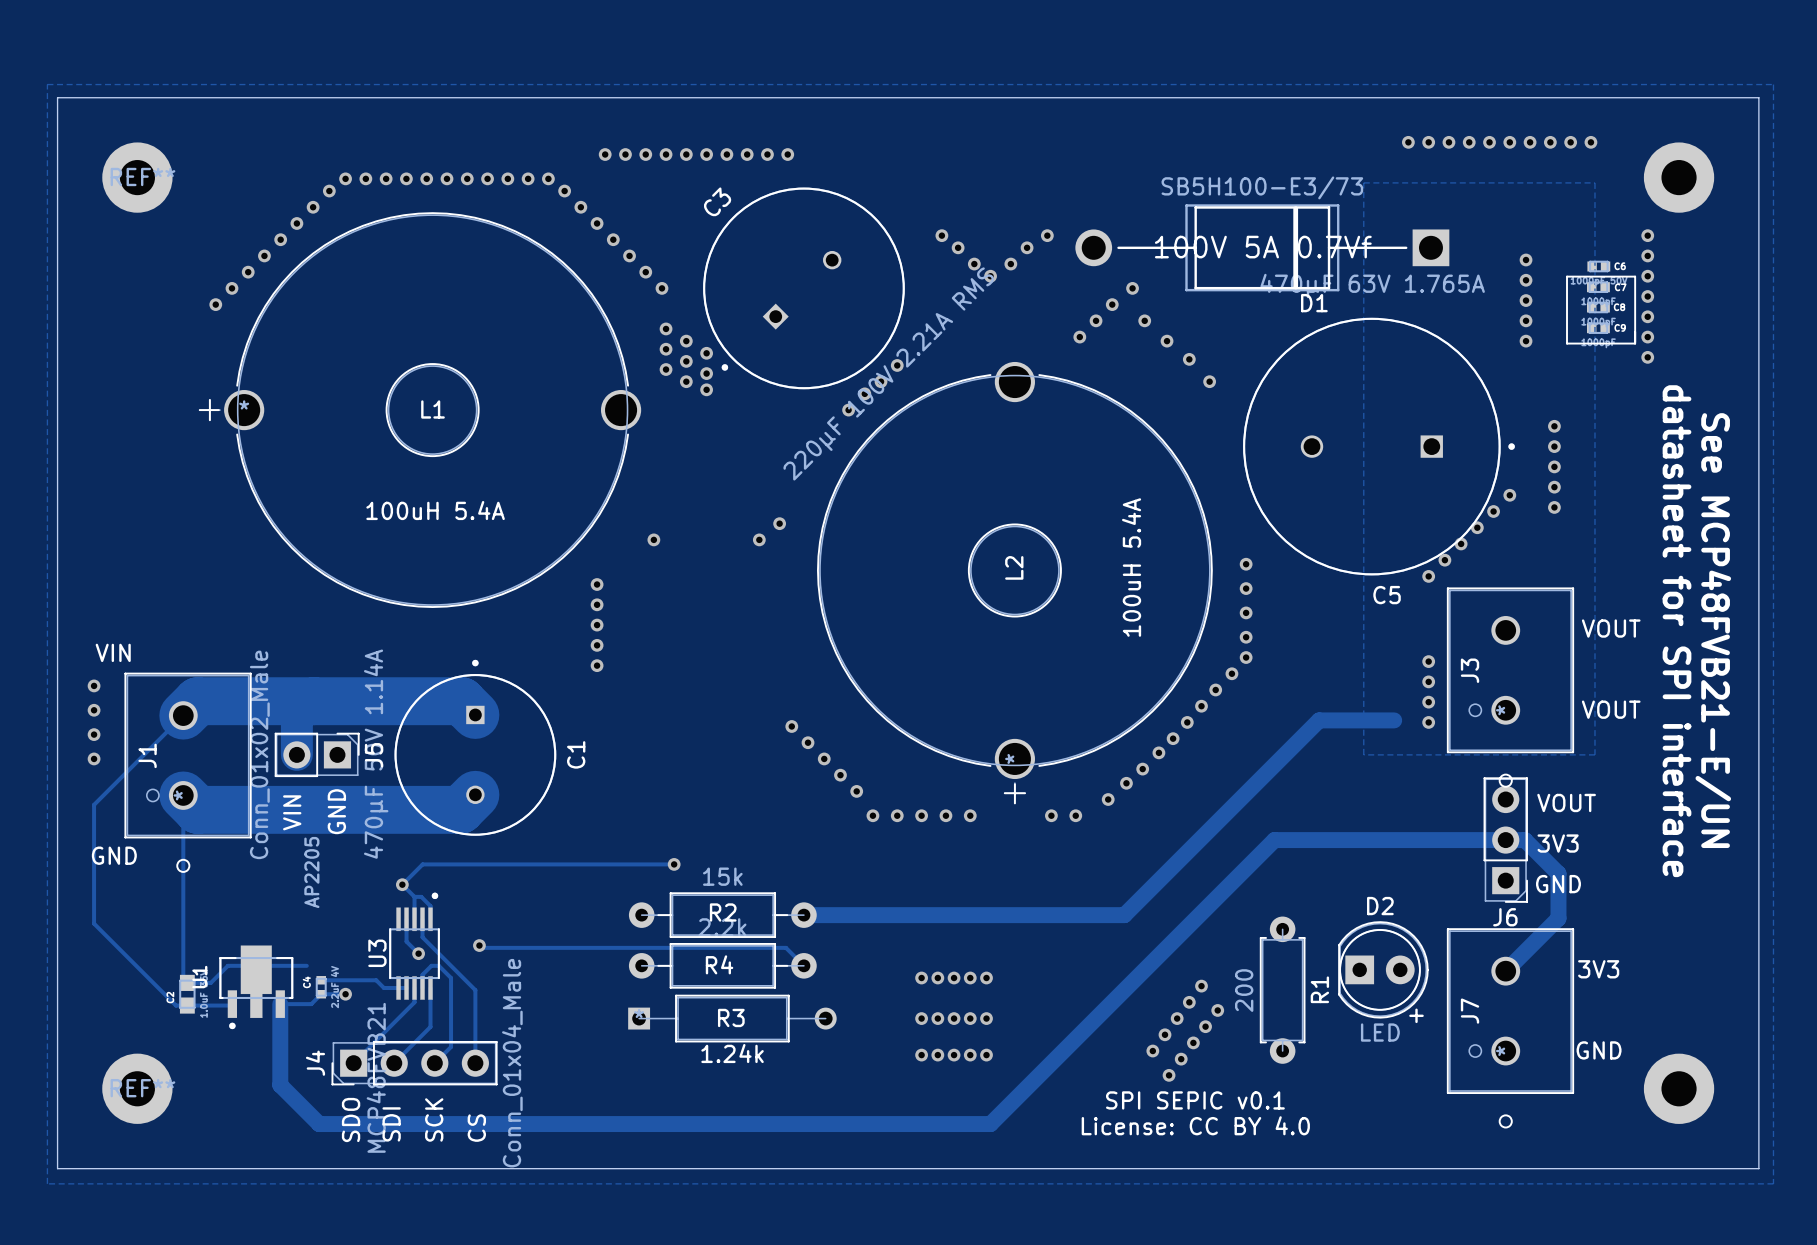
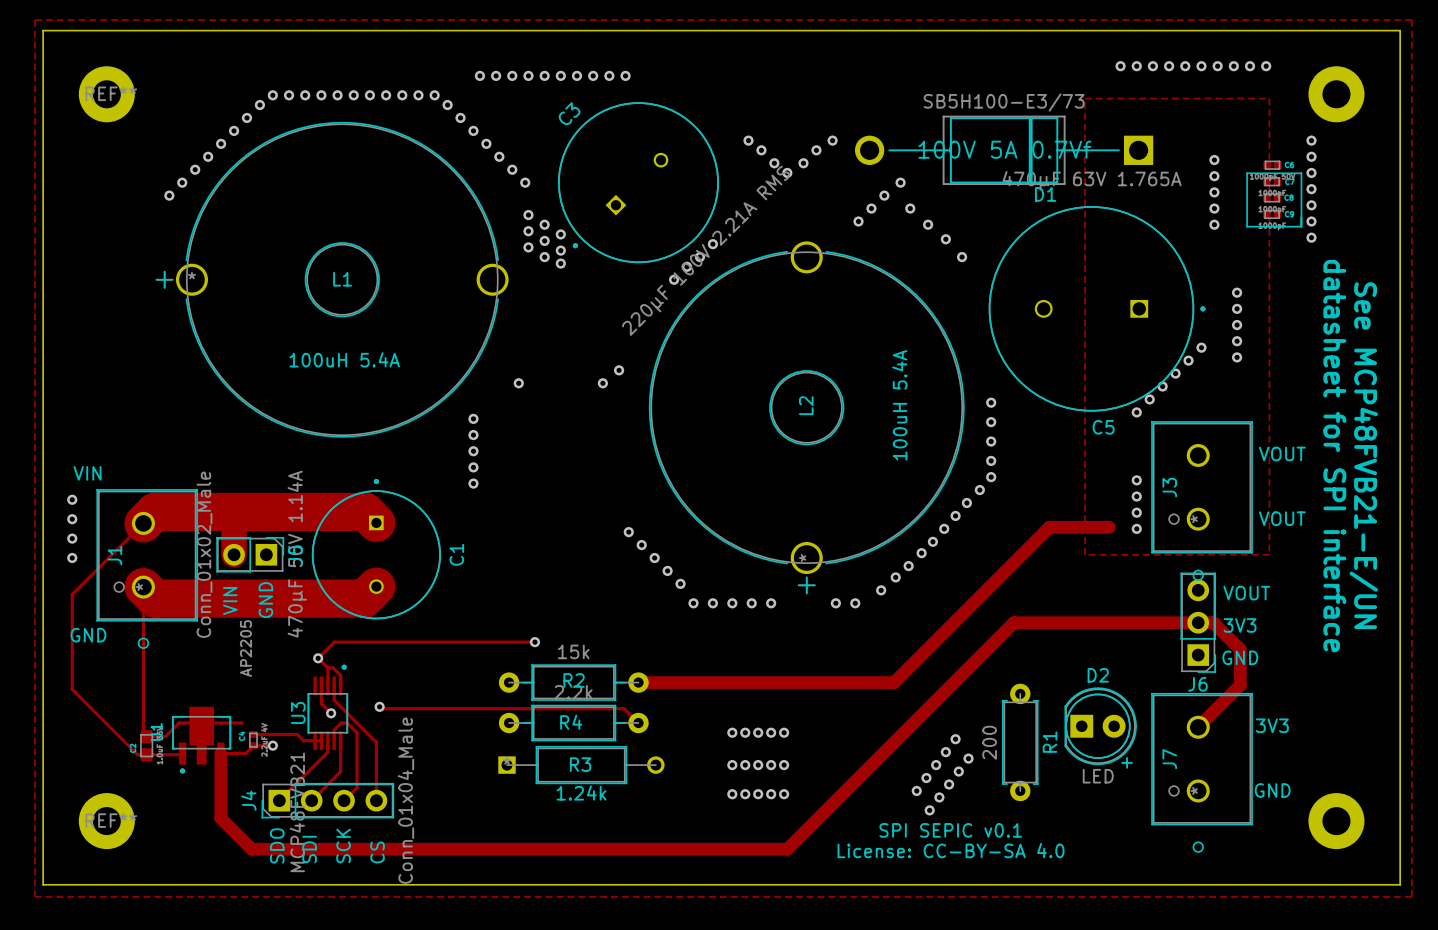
text: License: CC BY 4.0 (1195, 1125) -> License: CC-BY-SA 4.0 (951, 850)

